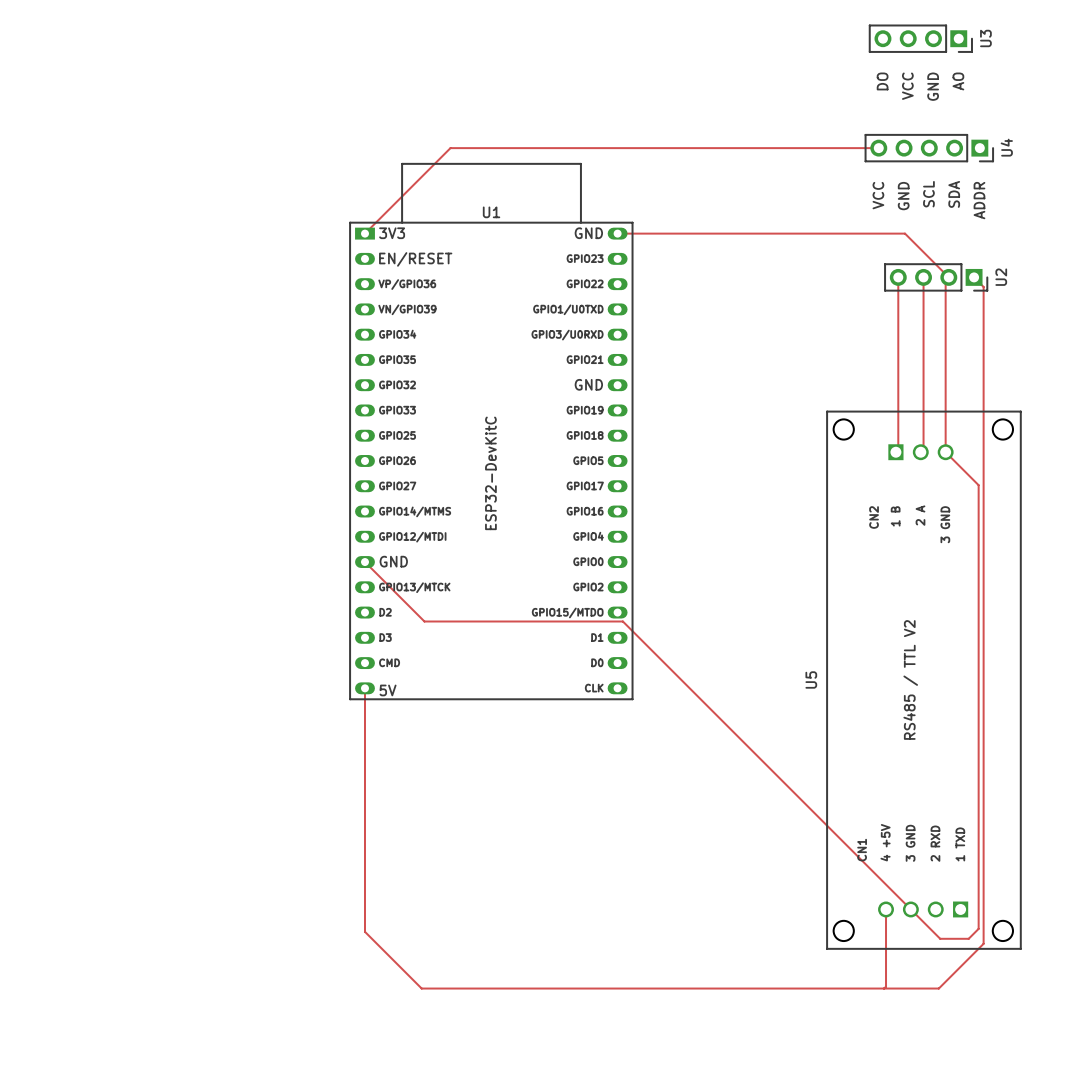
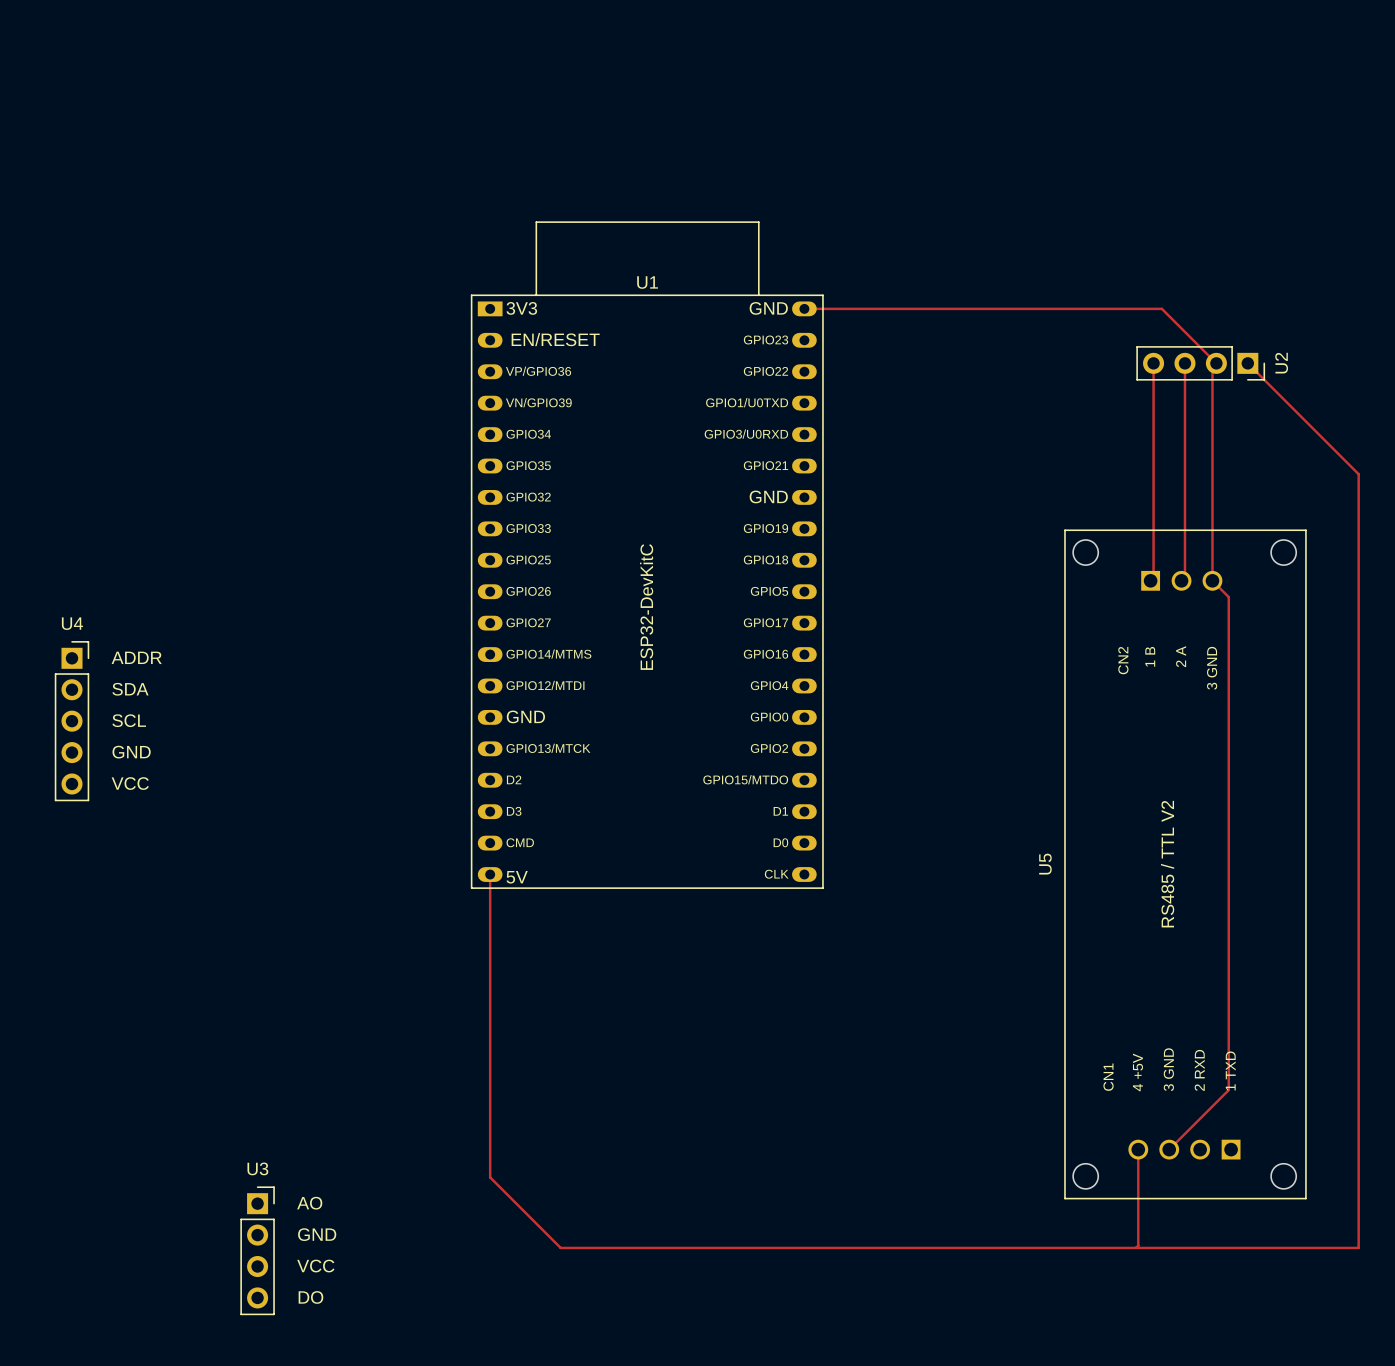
U3 rotation: 0° (920, 38) -> 90° counterclockwise (257, 1250)
U3 position: (920, 38) -> (257, 1250)
top track: (878, 148) (450, 148) (364, 233) -> none
U4 rotation: 0° (929, 148) -> 90° counterclockwise (72, 721)
U4 position: (929, 148) -> (72, 721)
top track: (983, 286) (983, 943) (938, 988) -> (1259, 375) (1358, 474) (1358, 1247) (1204, 1247)
top track: (958, 465) (978, 485) (978, 928) (968, 938) (940, 938) (622, 621) (424, 621) (364, 562) -> (1228, 597) (1228, 1090) (1169, 1149)

